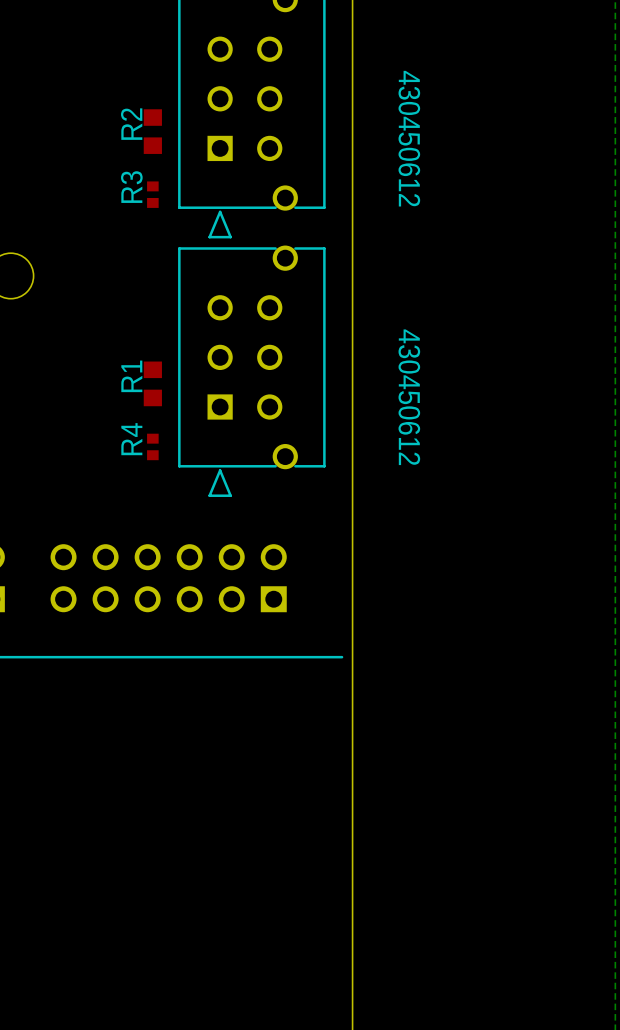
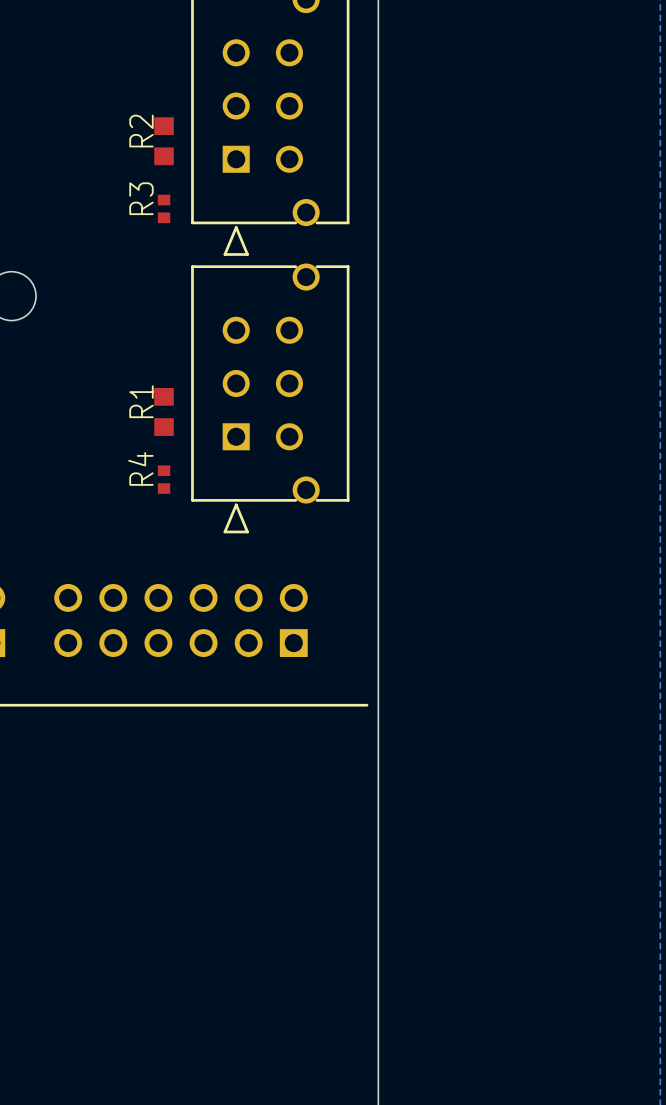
part value: 430450612 (409, 138) -> none
part value: 430450612 (409, 397) -> none

